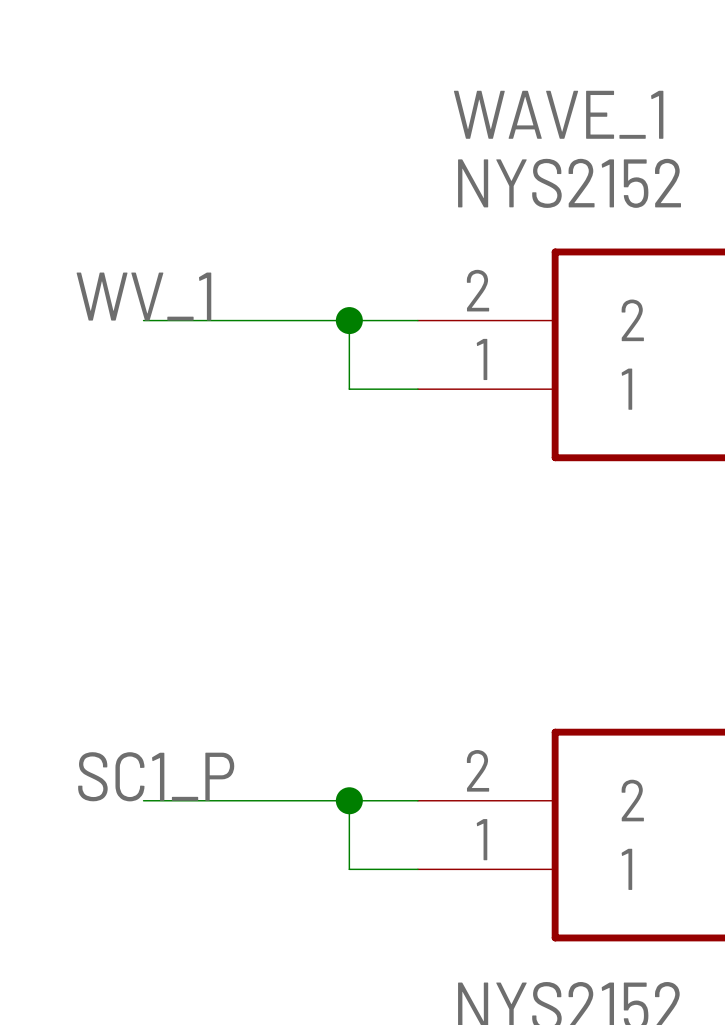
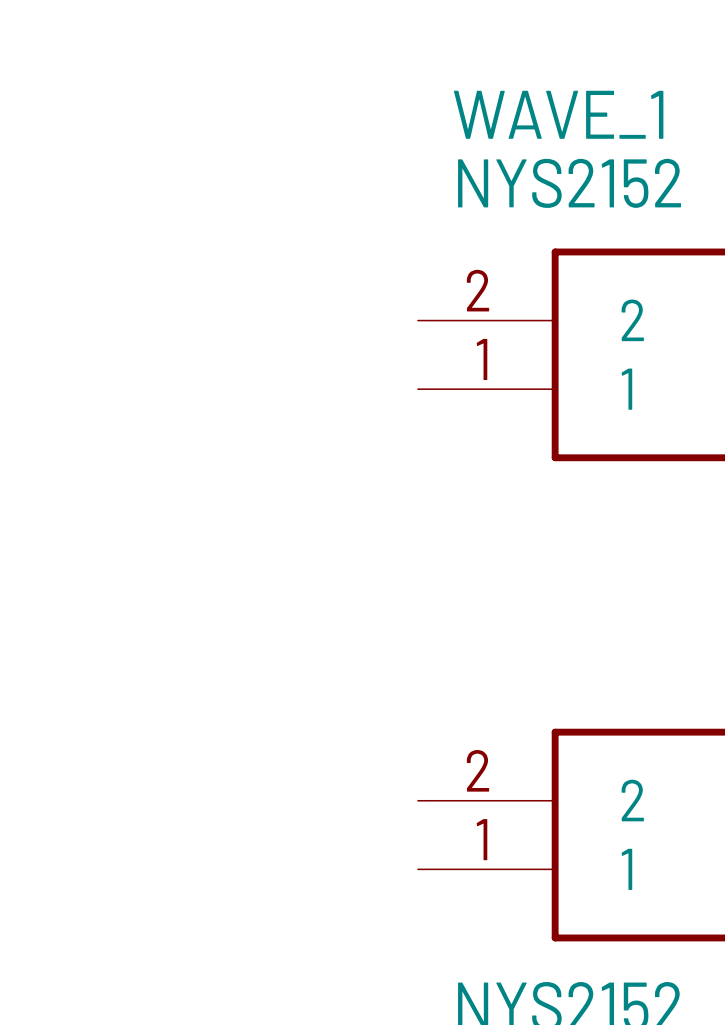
label: WV_1 (143, 296) -> none
wire: (143, 320) (417, 320) -> none
wire: (349, 320) (349, 389) (417, 389) -> none
junction: (349, 320) -> none
label: SC1_P (156, 776) -> none
wire: (143, 800) (417, 800) -> none
wire: (349, 800) (349, 869) (417, 869) -> none
junction: (349, 800) -> none

